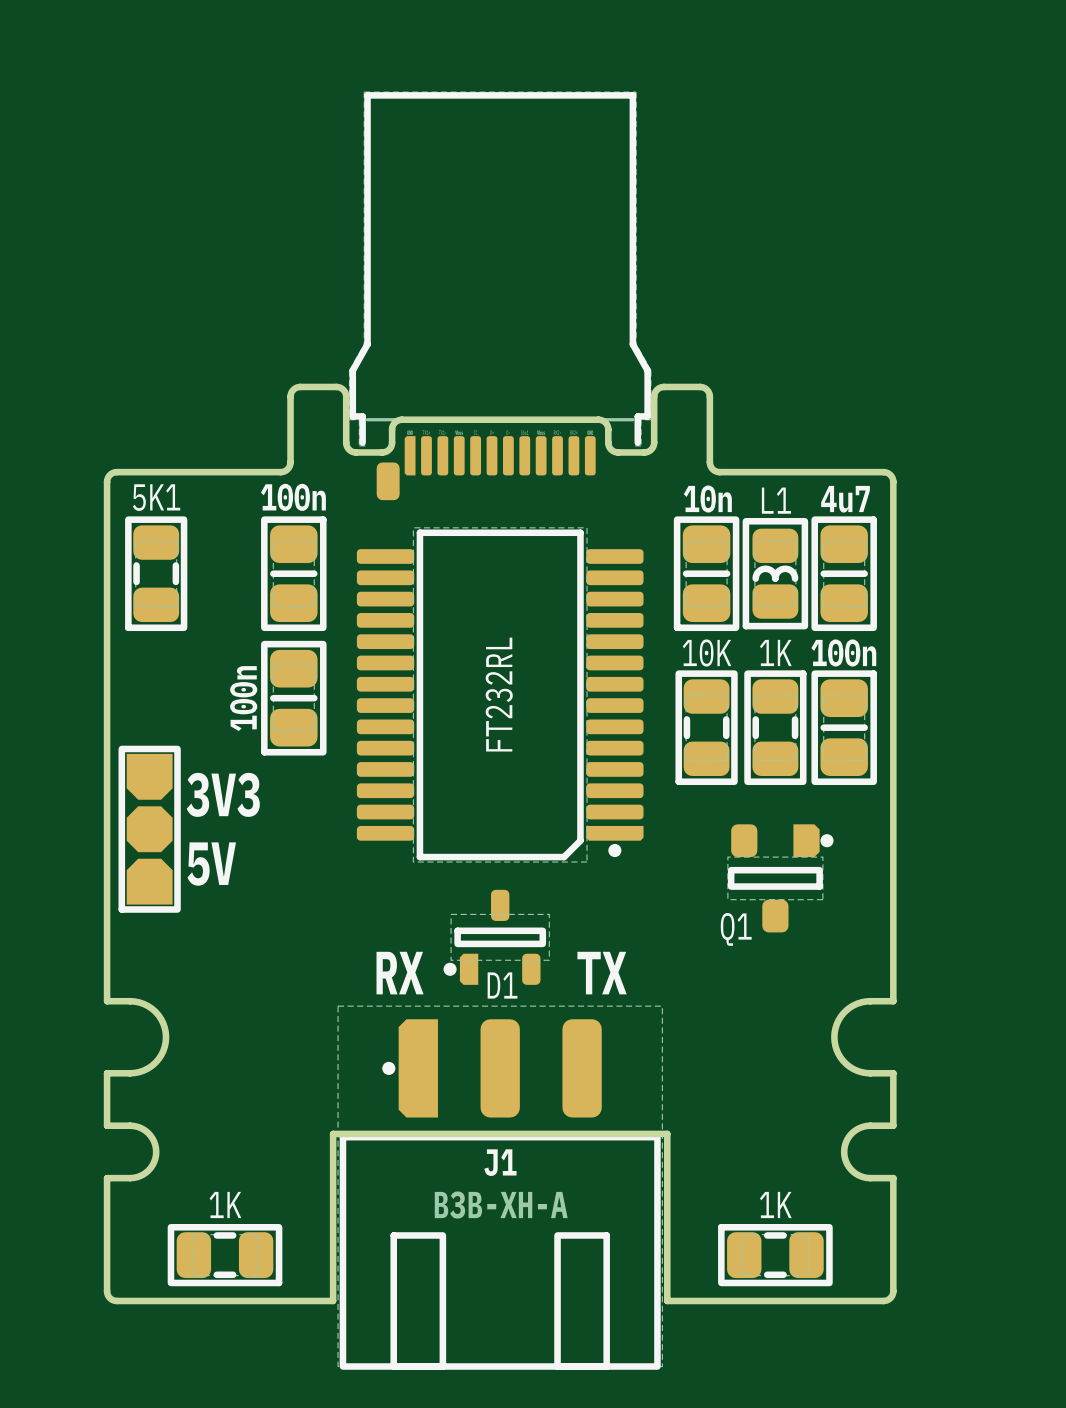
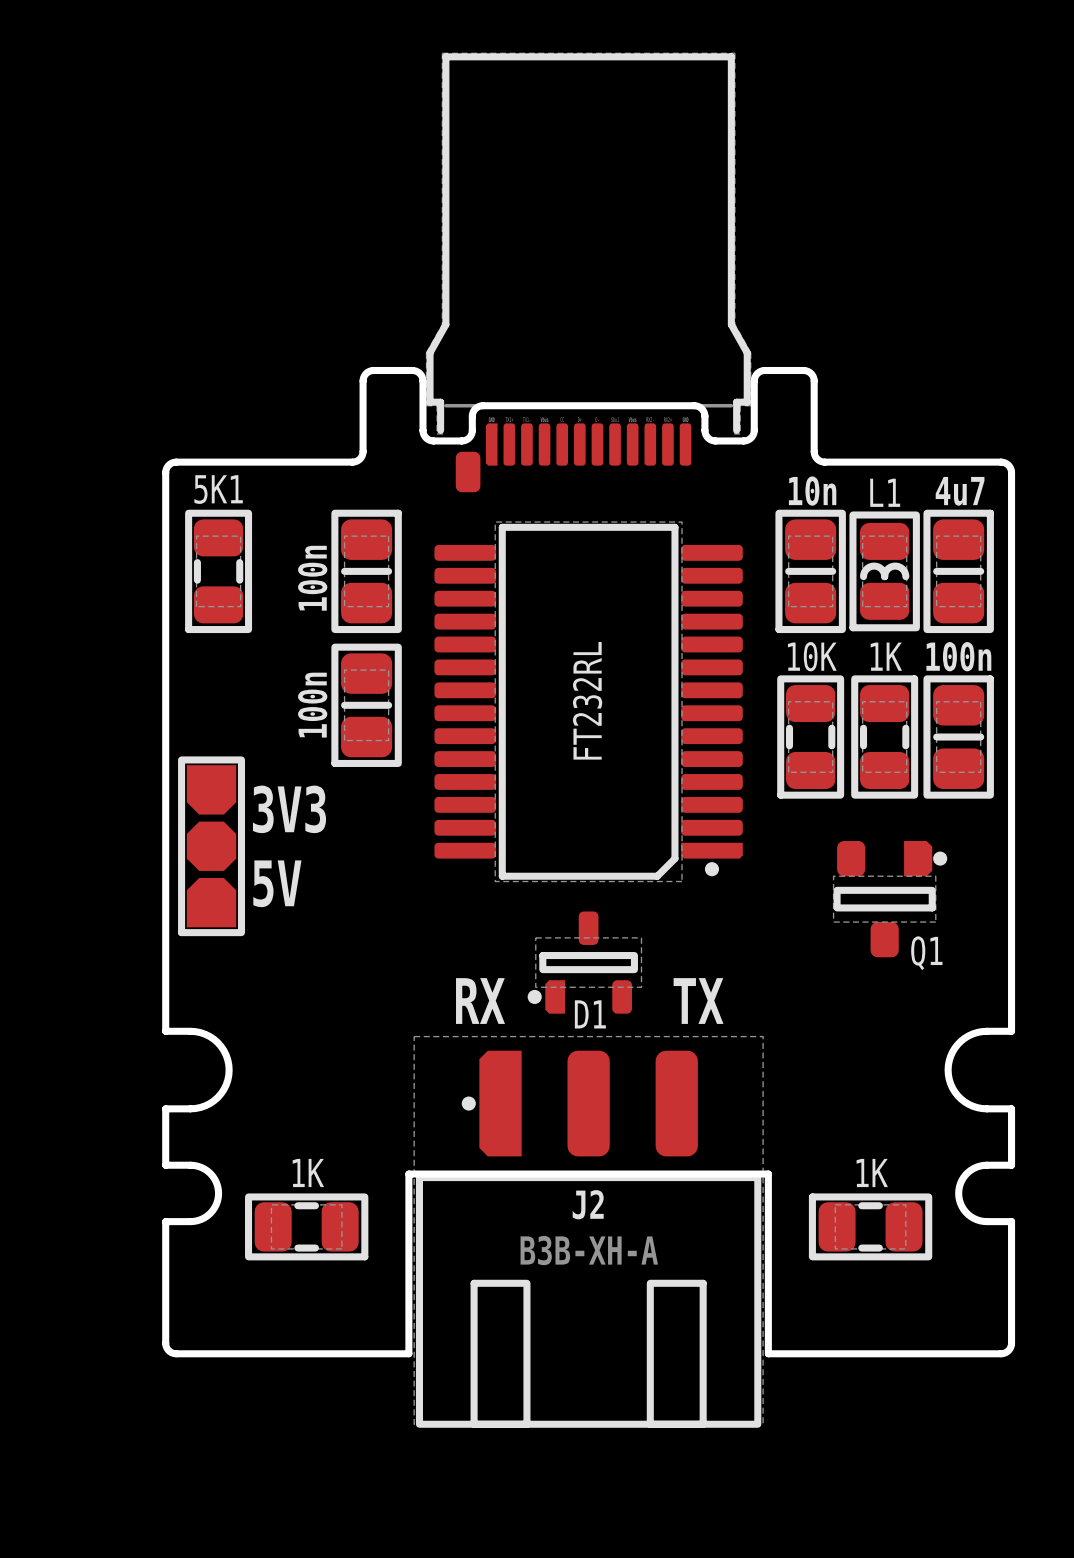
part value rotation: 0° (293, 497) -> 90° counterclockwise (312, 578)
part value position: 100n (293, 497) -> 100n (312, 578)
Q1 name position: Q1 (736, 929) -> Q1 (926, 953)
J1 name: J1 (500, 1162) -> J2 (588, 1204)
part position: (225, 1255) -> (306, 1226)
part position: (775, 1255) -> (870, 1226)

